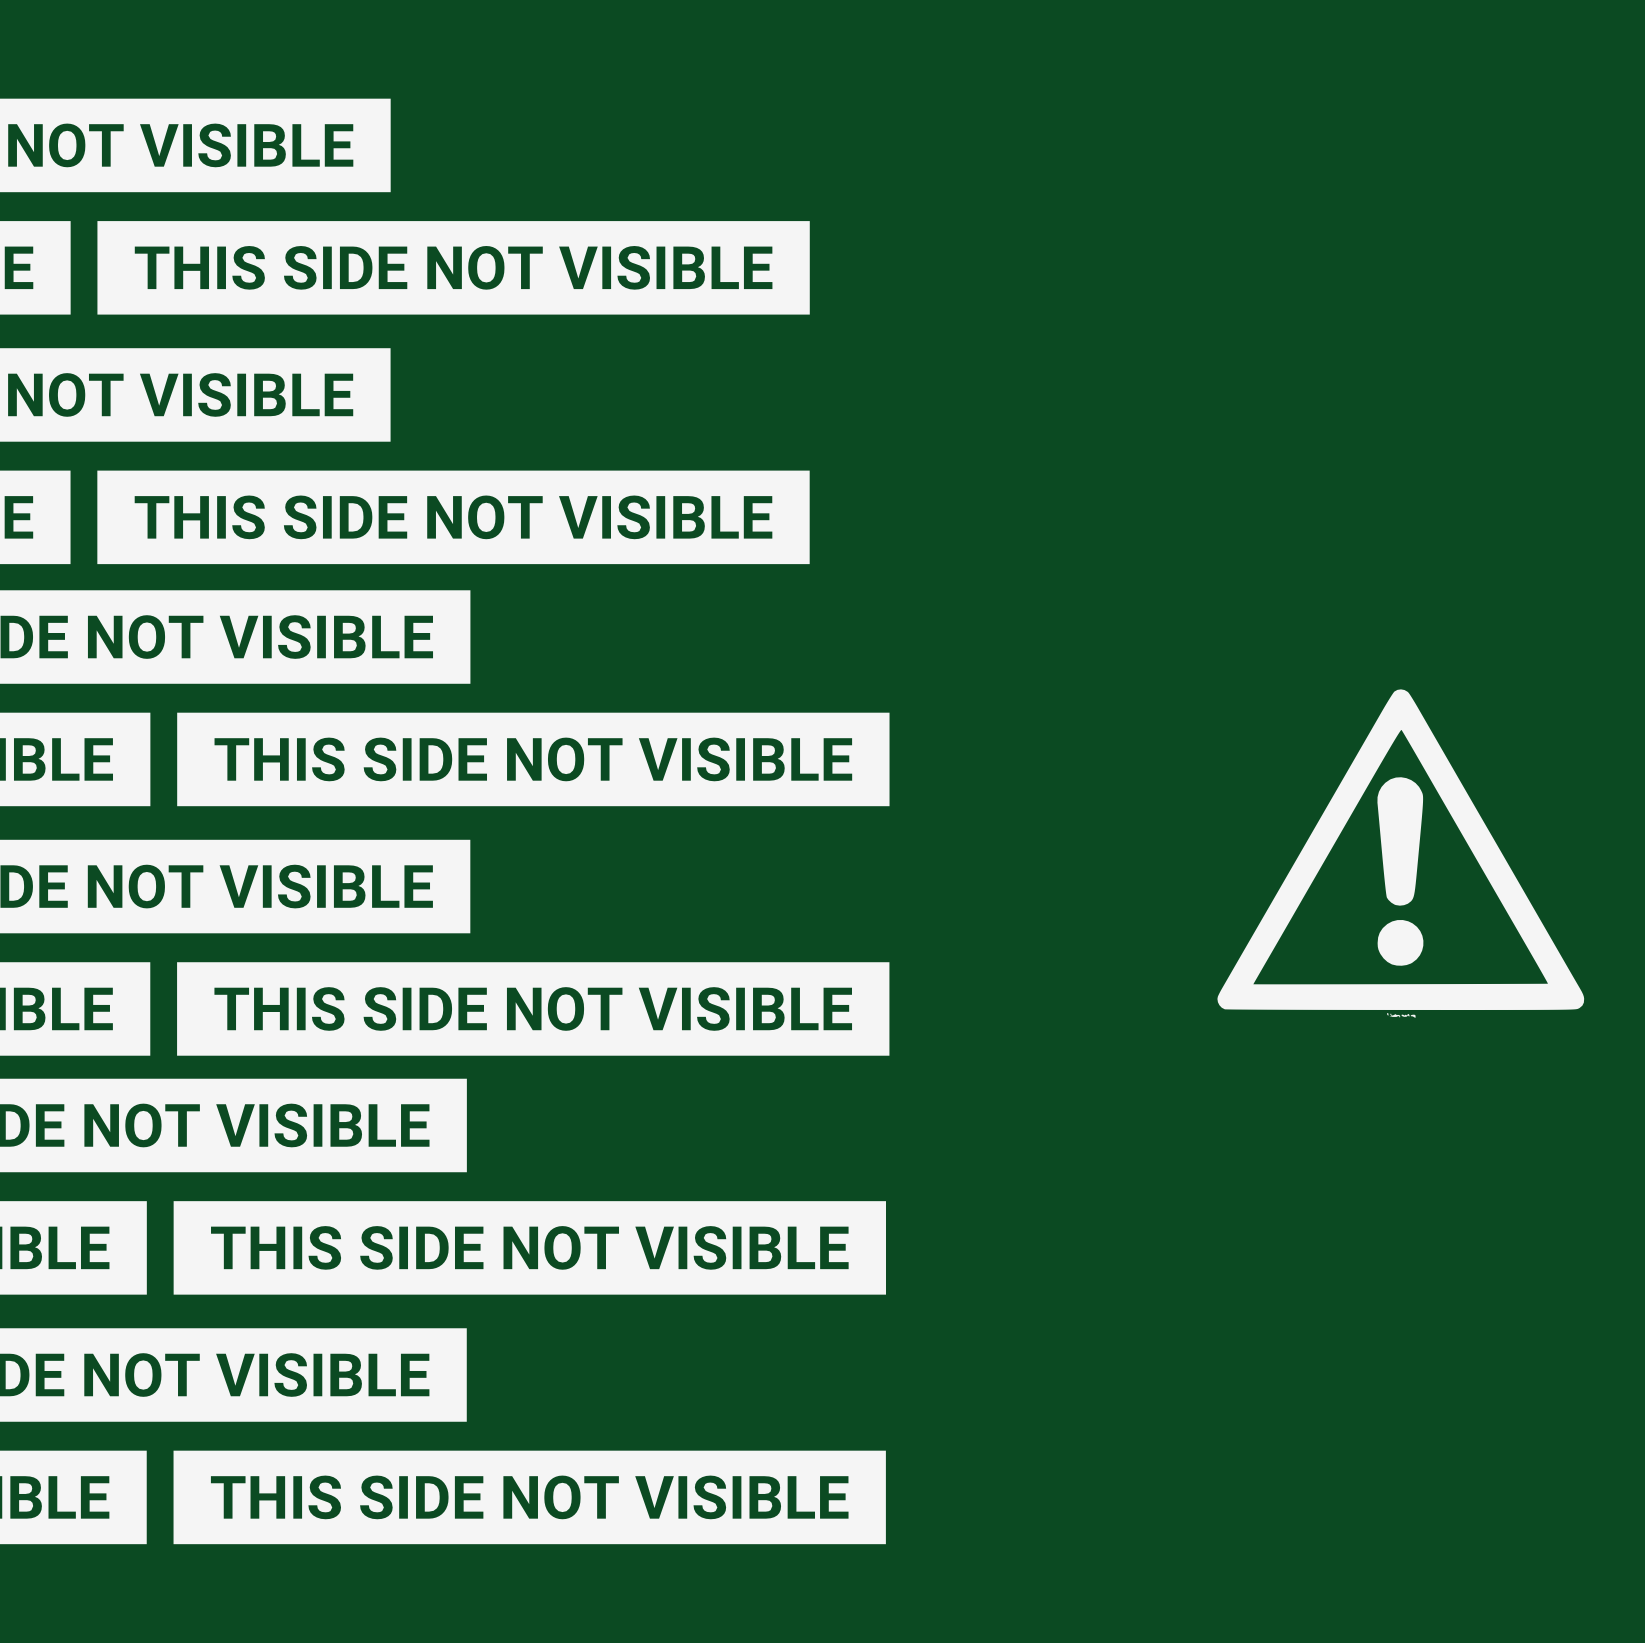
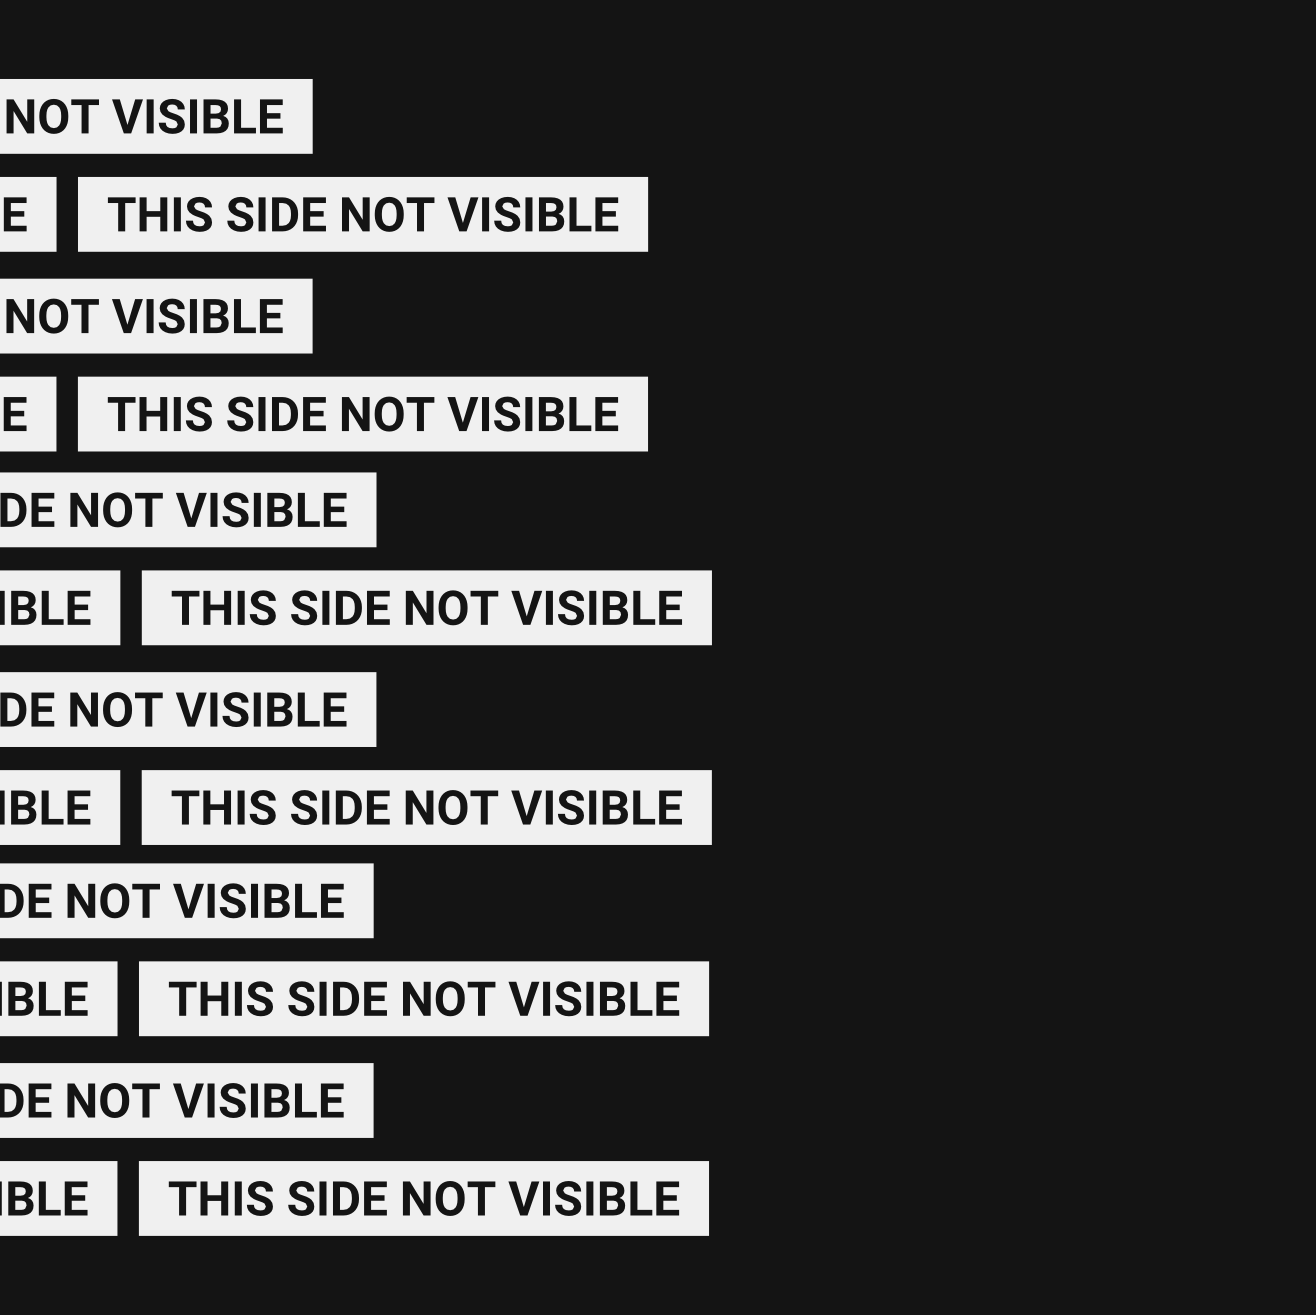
drawing: [1217, 689, 1585, 1018] -> none

